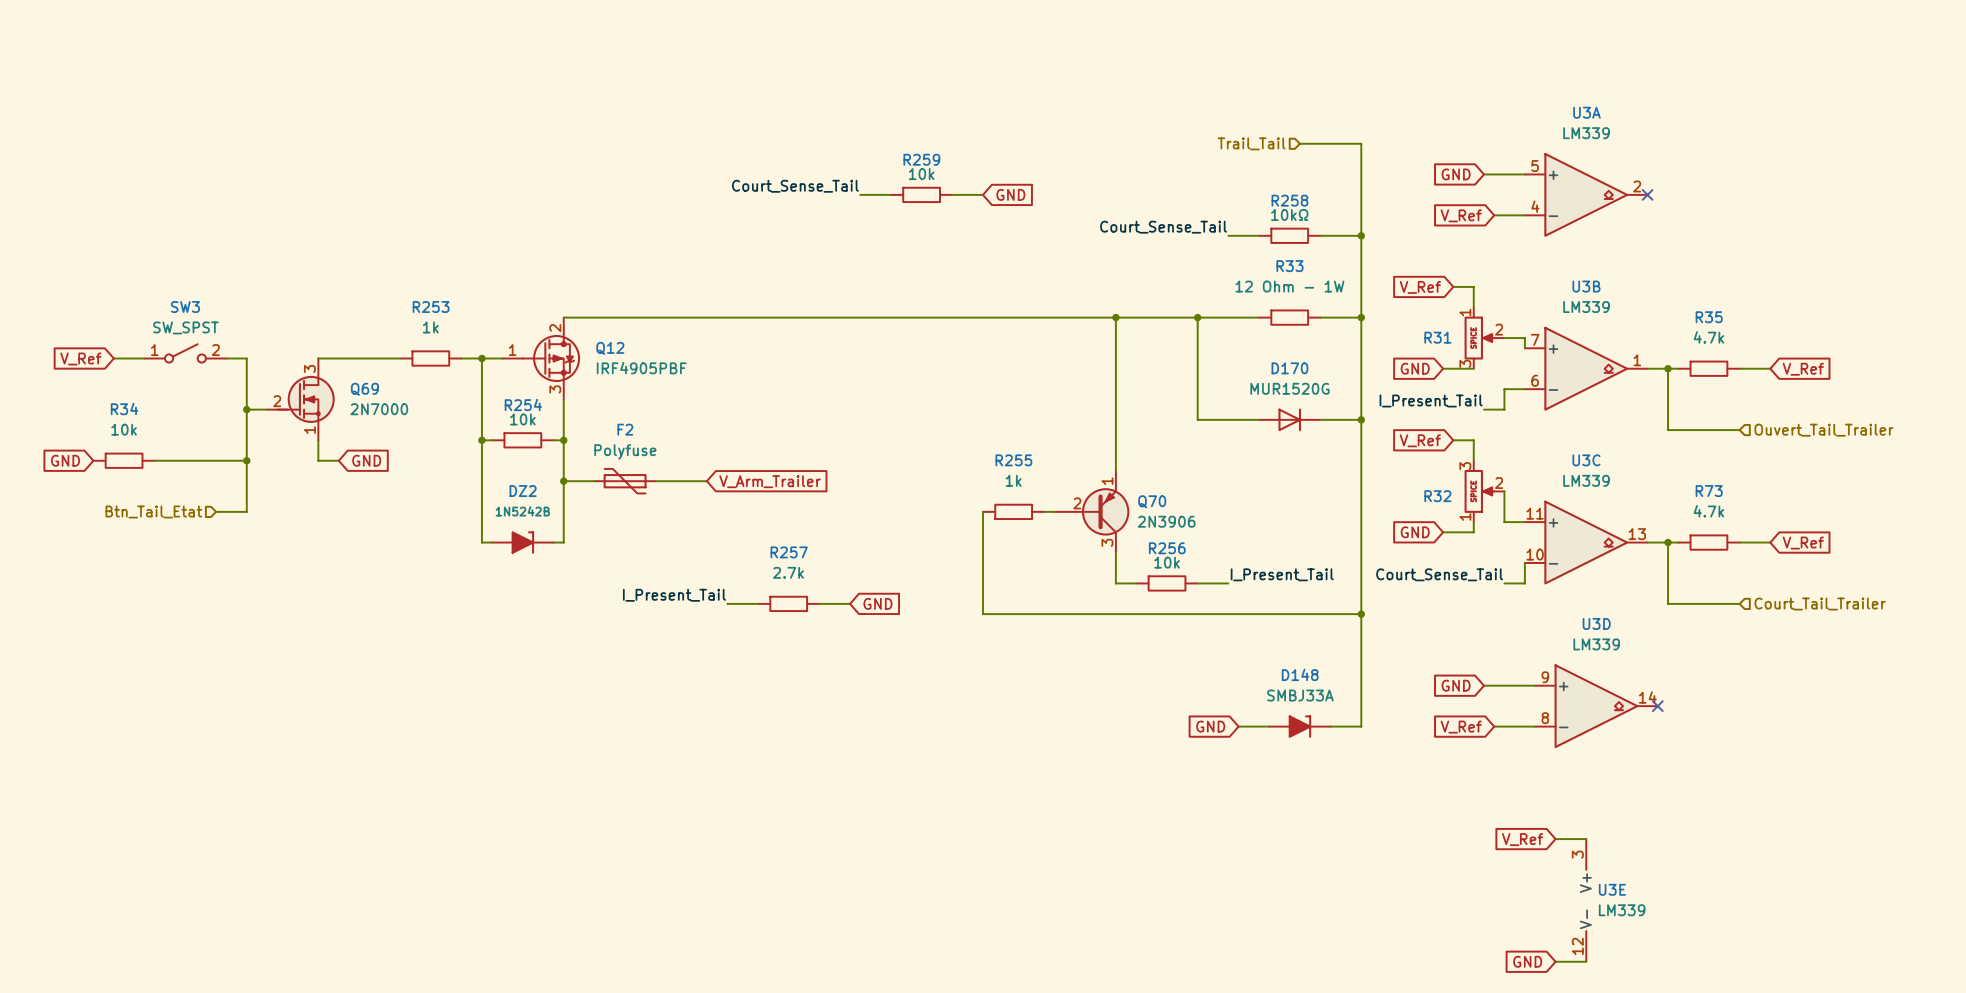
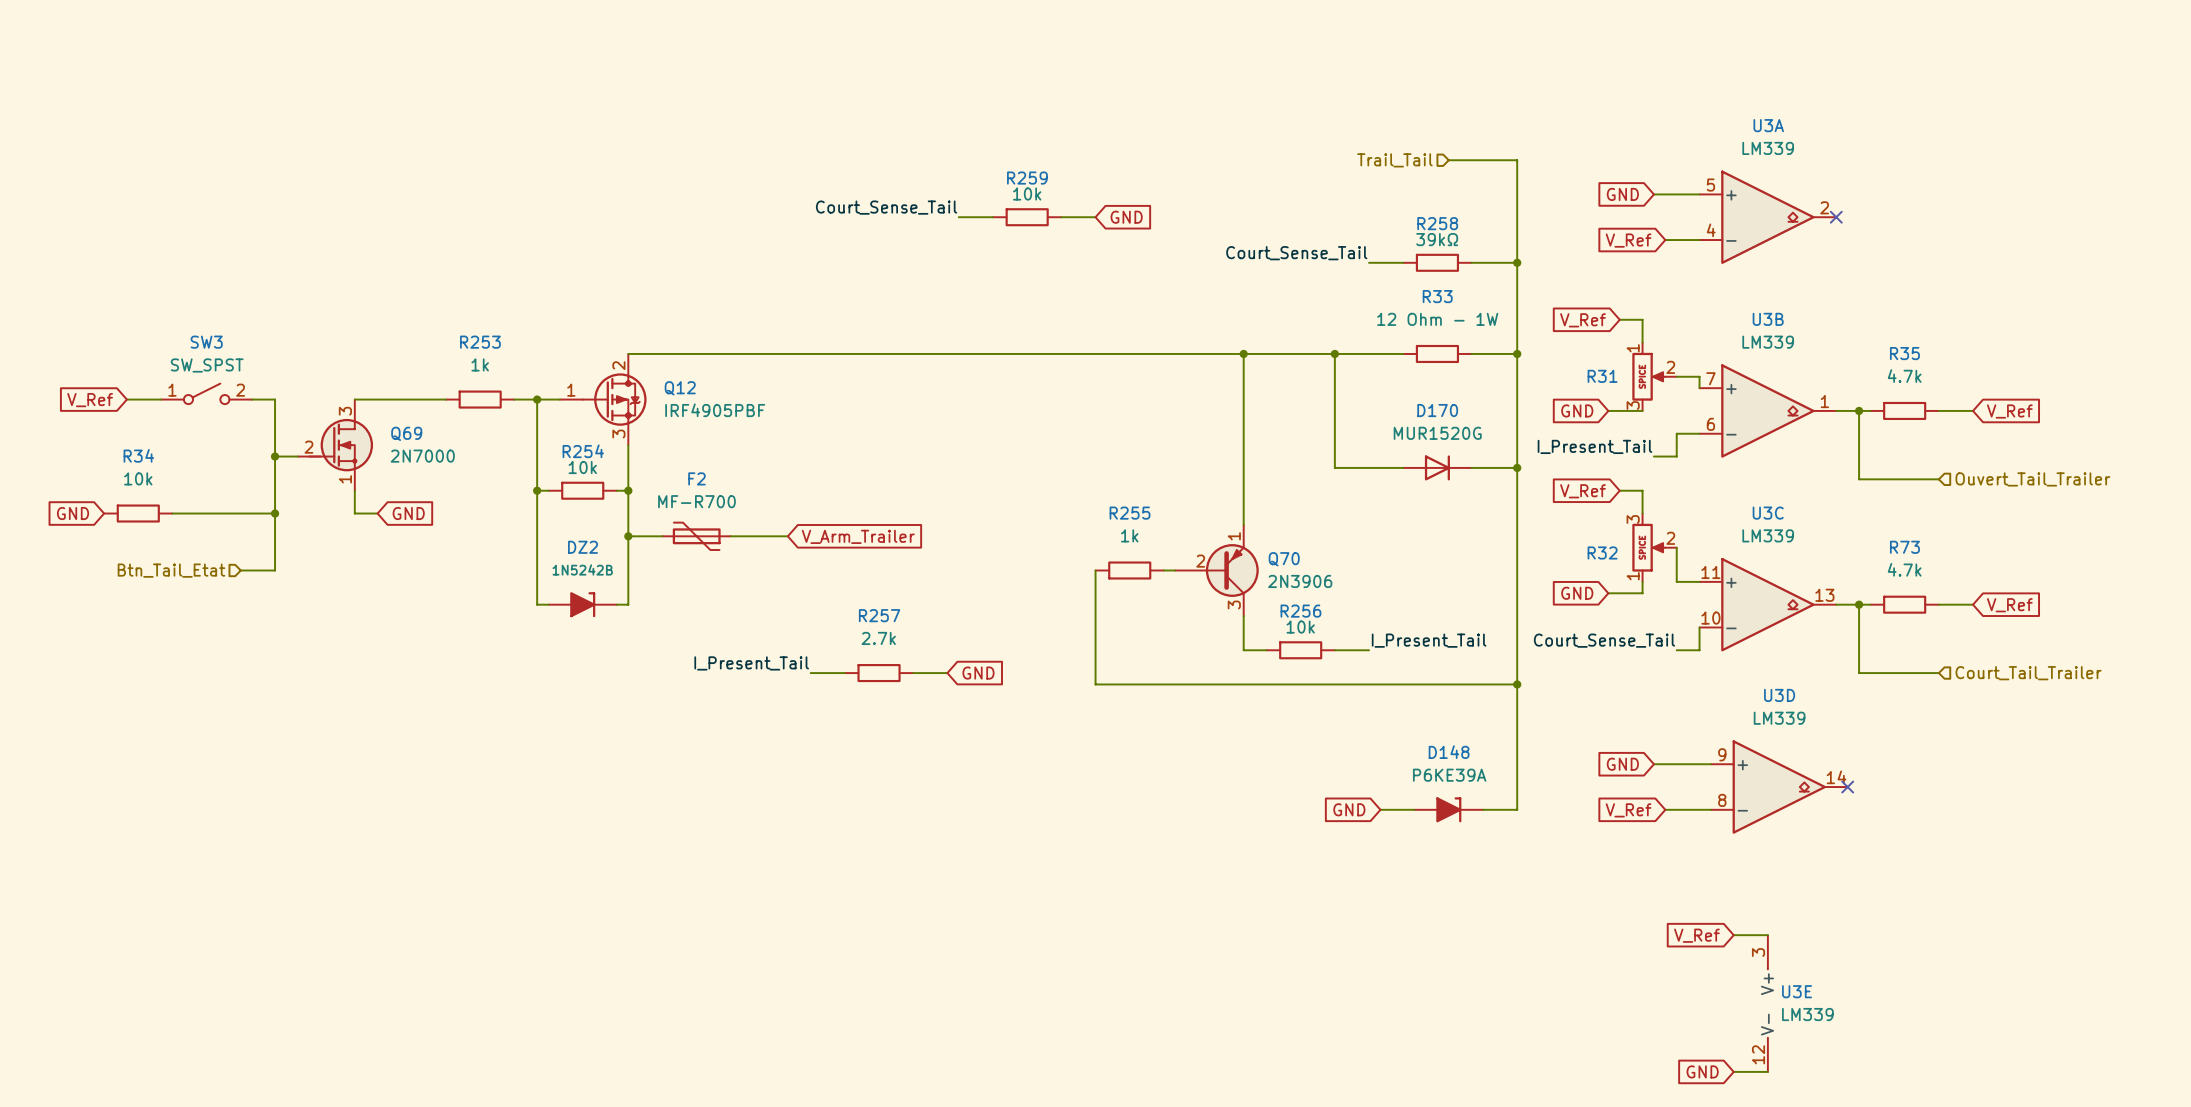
R258 value: 10kΩ (1289, 214) -> 39kΩ (1437, 239)
F2 value: Polyfuse (625, 451) -> MF-R700 (696, 501)
D148 value: SMBJ33A (1300, 695) -> P6KE39A (1449, 775)

